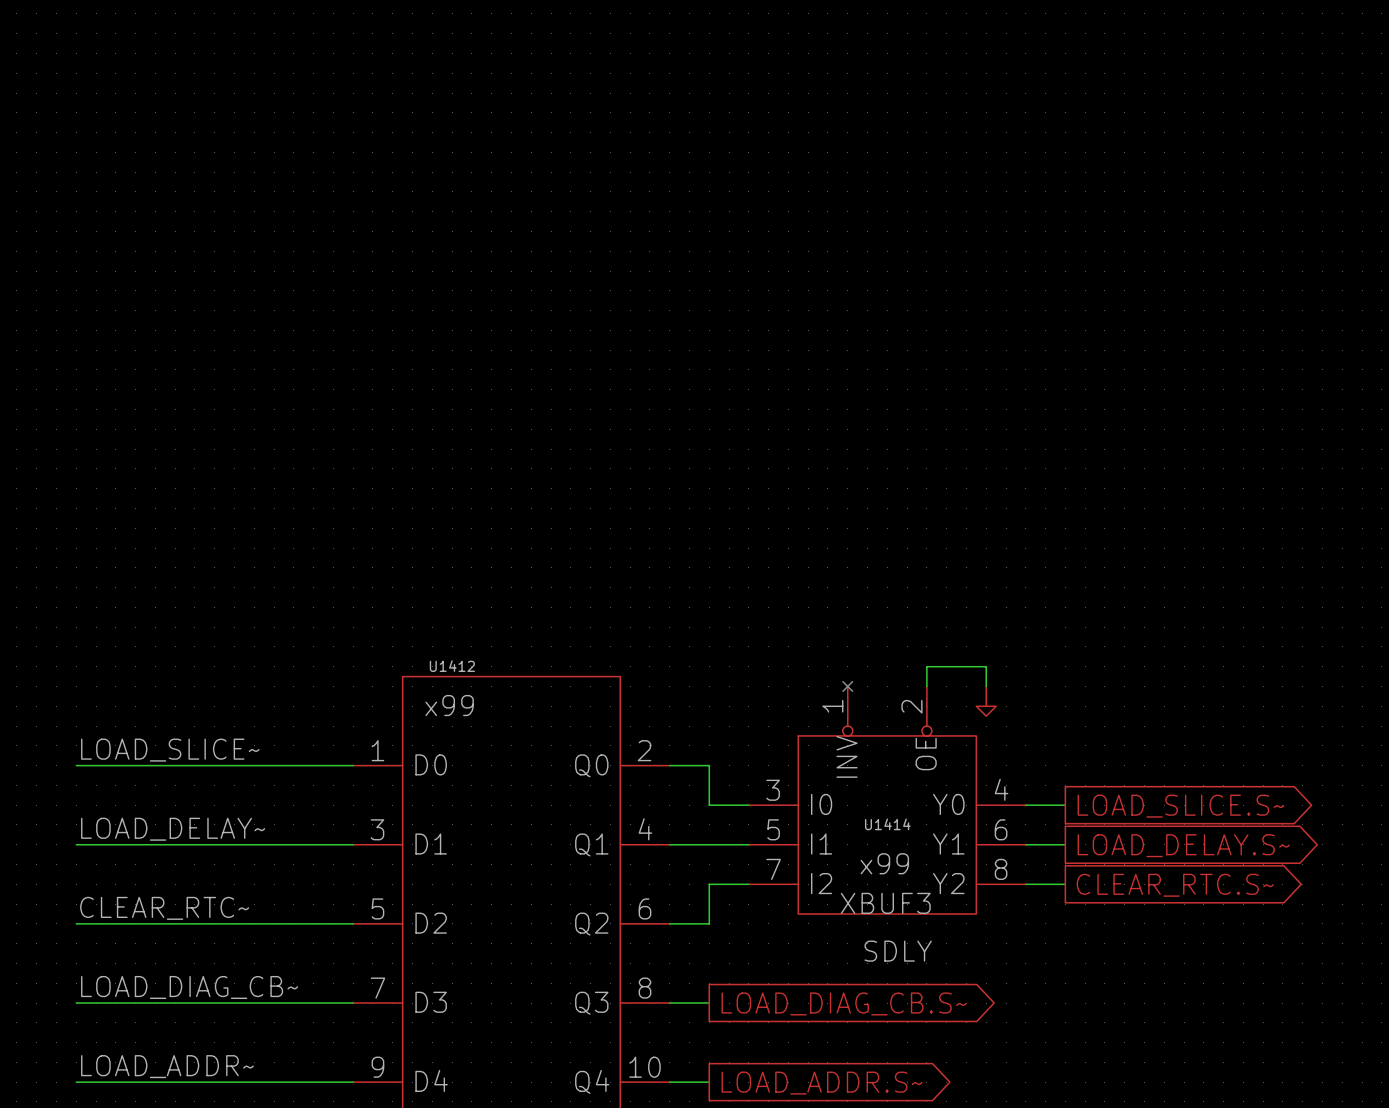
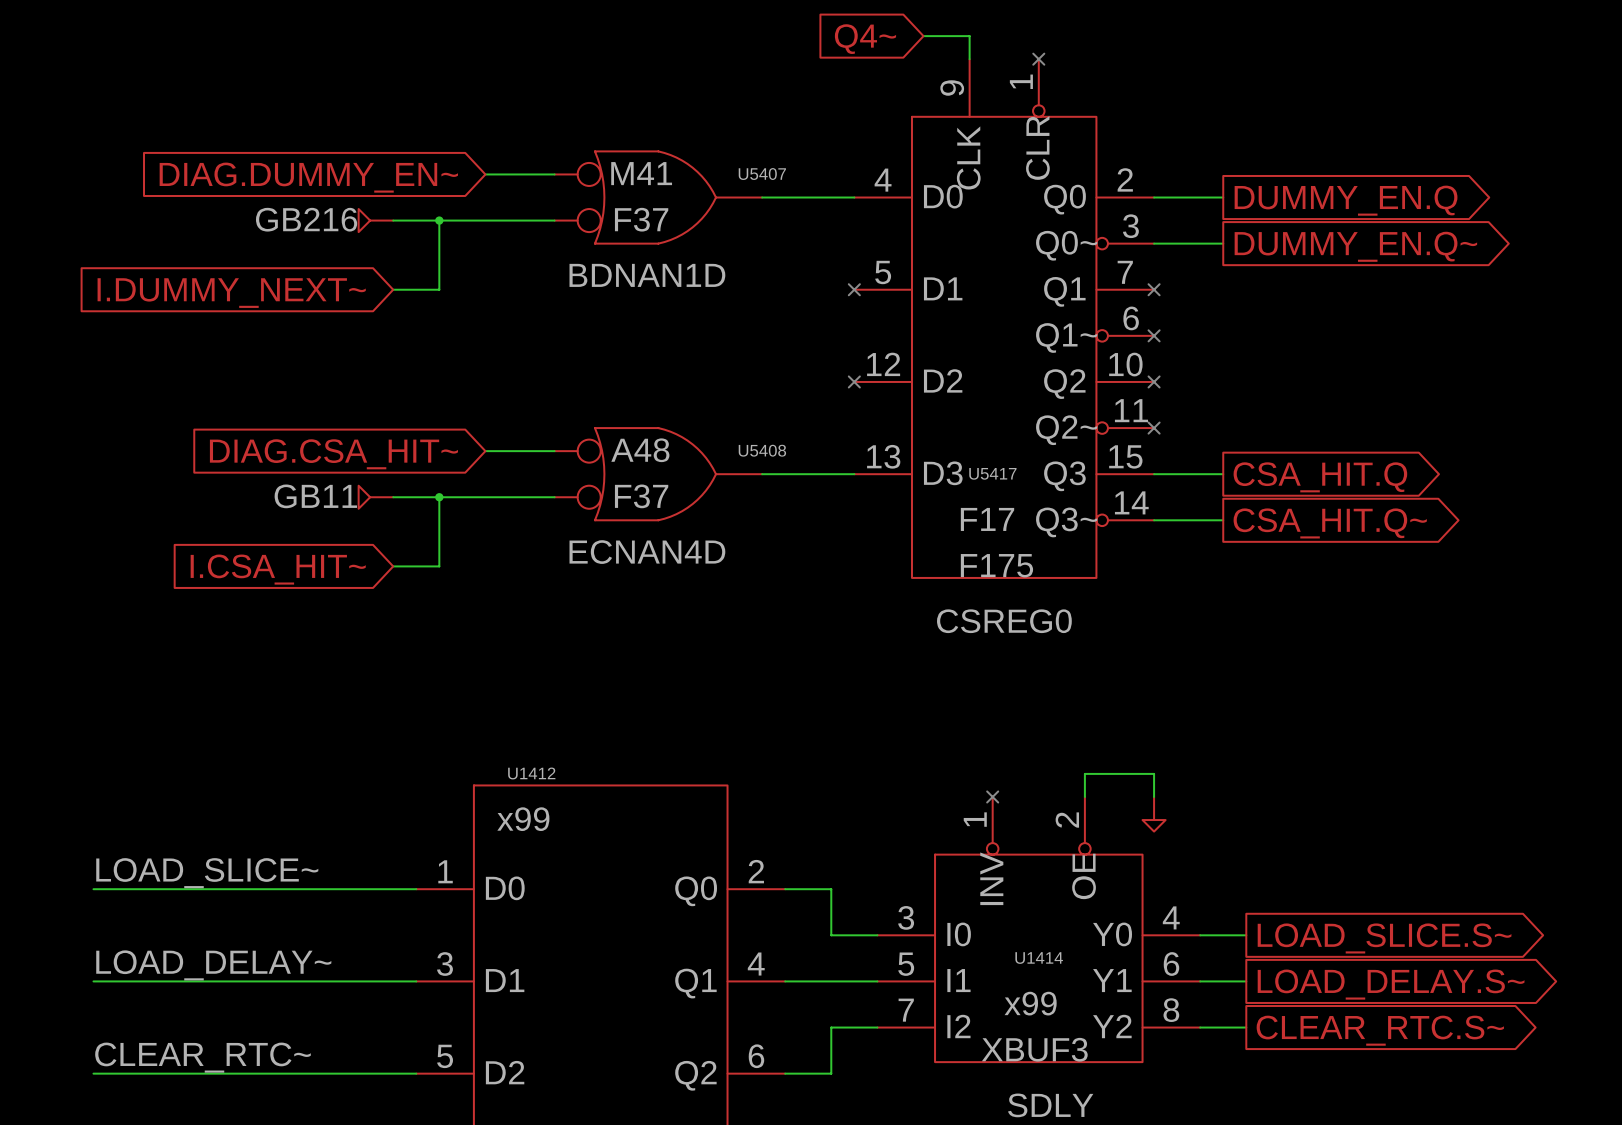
wire: none -> (923, 36) (969, 36) (969, 59)
global label: none -> Q4~ (865, 39)
no-connect mark: none -> (1038, 59)
wire: none -> (485, 174) (554, 174)
global label: none -> DIAG.DUMMY_EN~ (308, 177)
U5407: none -> F37 (658, 197)
wire: none -> (762, 197) (854, 197)
wire: none -> (1154, 197) (1223, 197)
global label: none -> DUMMY_EN.Q (1346, 200)
GB216: none -> (375, 220)
wire: none -> (393, 220) (554, 220)
wire: none -> (439, 220) (439, 289) (393, 289)
junction: none -> (439, 220)
wire: none -> (1154, 243) (1223, 243)
global label: none -> DUMMY_EN.Q~ (1355, 246)
no-connect mark: none -> (854, 289)
no-connect mark: none -> (1154, 289)
global label: none -> I.DUMMY_NEXT~ (231, 293)
U5417: none -> F175 (1004, 318)
no-connect mark: none -> (1154, 335)
no-connect mark: none -> (854, 381)
no-connect mark: none -> (1154, 381)
no-connect mark: none -> (1154, 428)
wire: none -> (485, 451) (554, 451)
global label: none -> DIAG.CSA_HIT~ (333, 454)
U5408: none -> F37 (658, 474)
wire: none -> (762, 474) (854, 474)
wire: none -> (1154, 474) (1223, 474)
global label: none -> CSA_HIT.Q (1320, 477)
GB11: none -> (375, 497)
wire: none -> (393, 497) (554, 497)
wire: none -> (439, 497) (439, 566) (393, 566)
junction: none -> (439, 497)
wire: none -> (1154, 520) (1223, 520)
global label: none -> CSA_HIT.Q~ (1330, 523)
global label: none -> I.CSA_HIT~ (278, 569)

